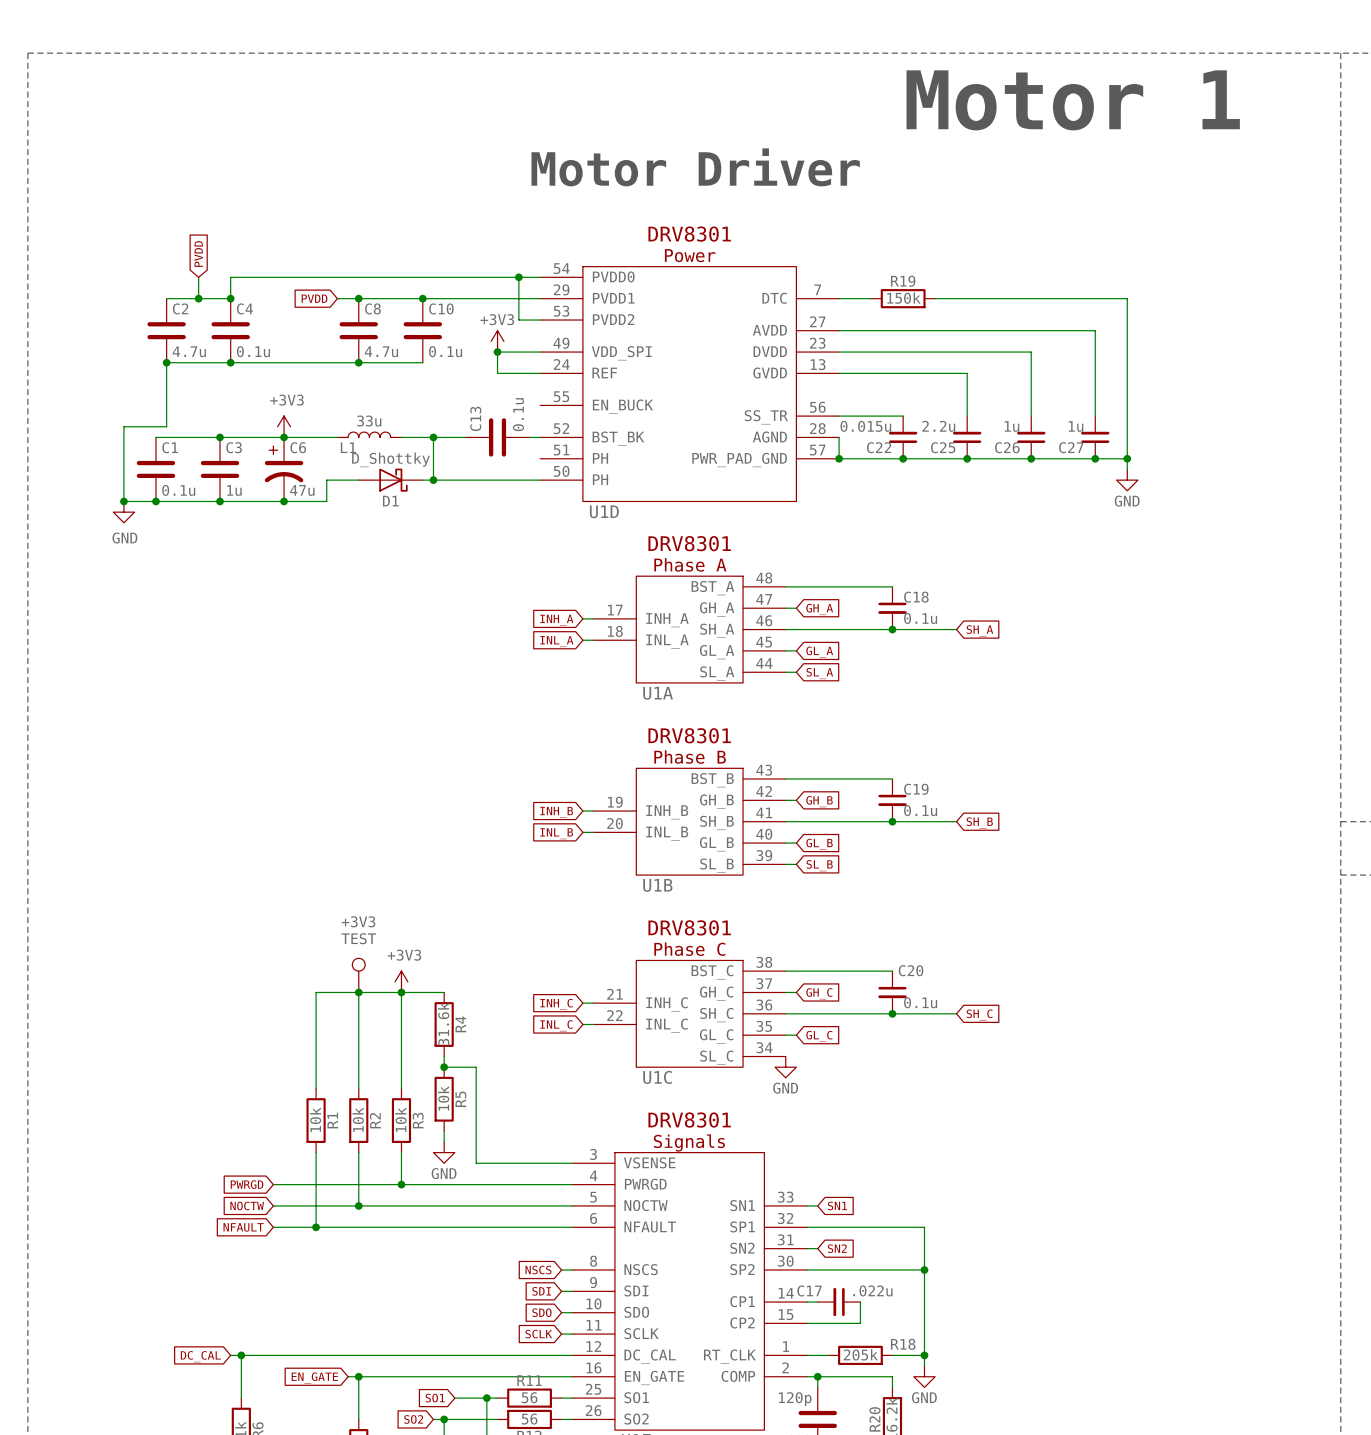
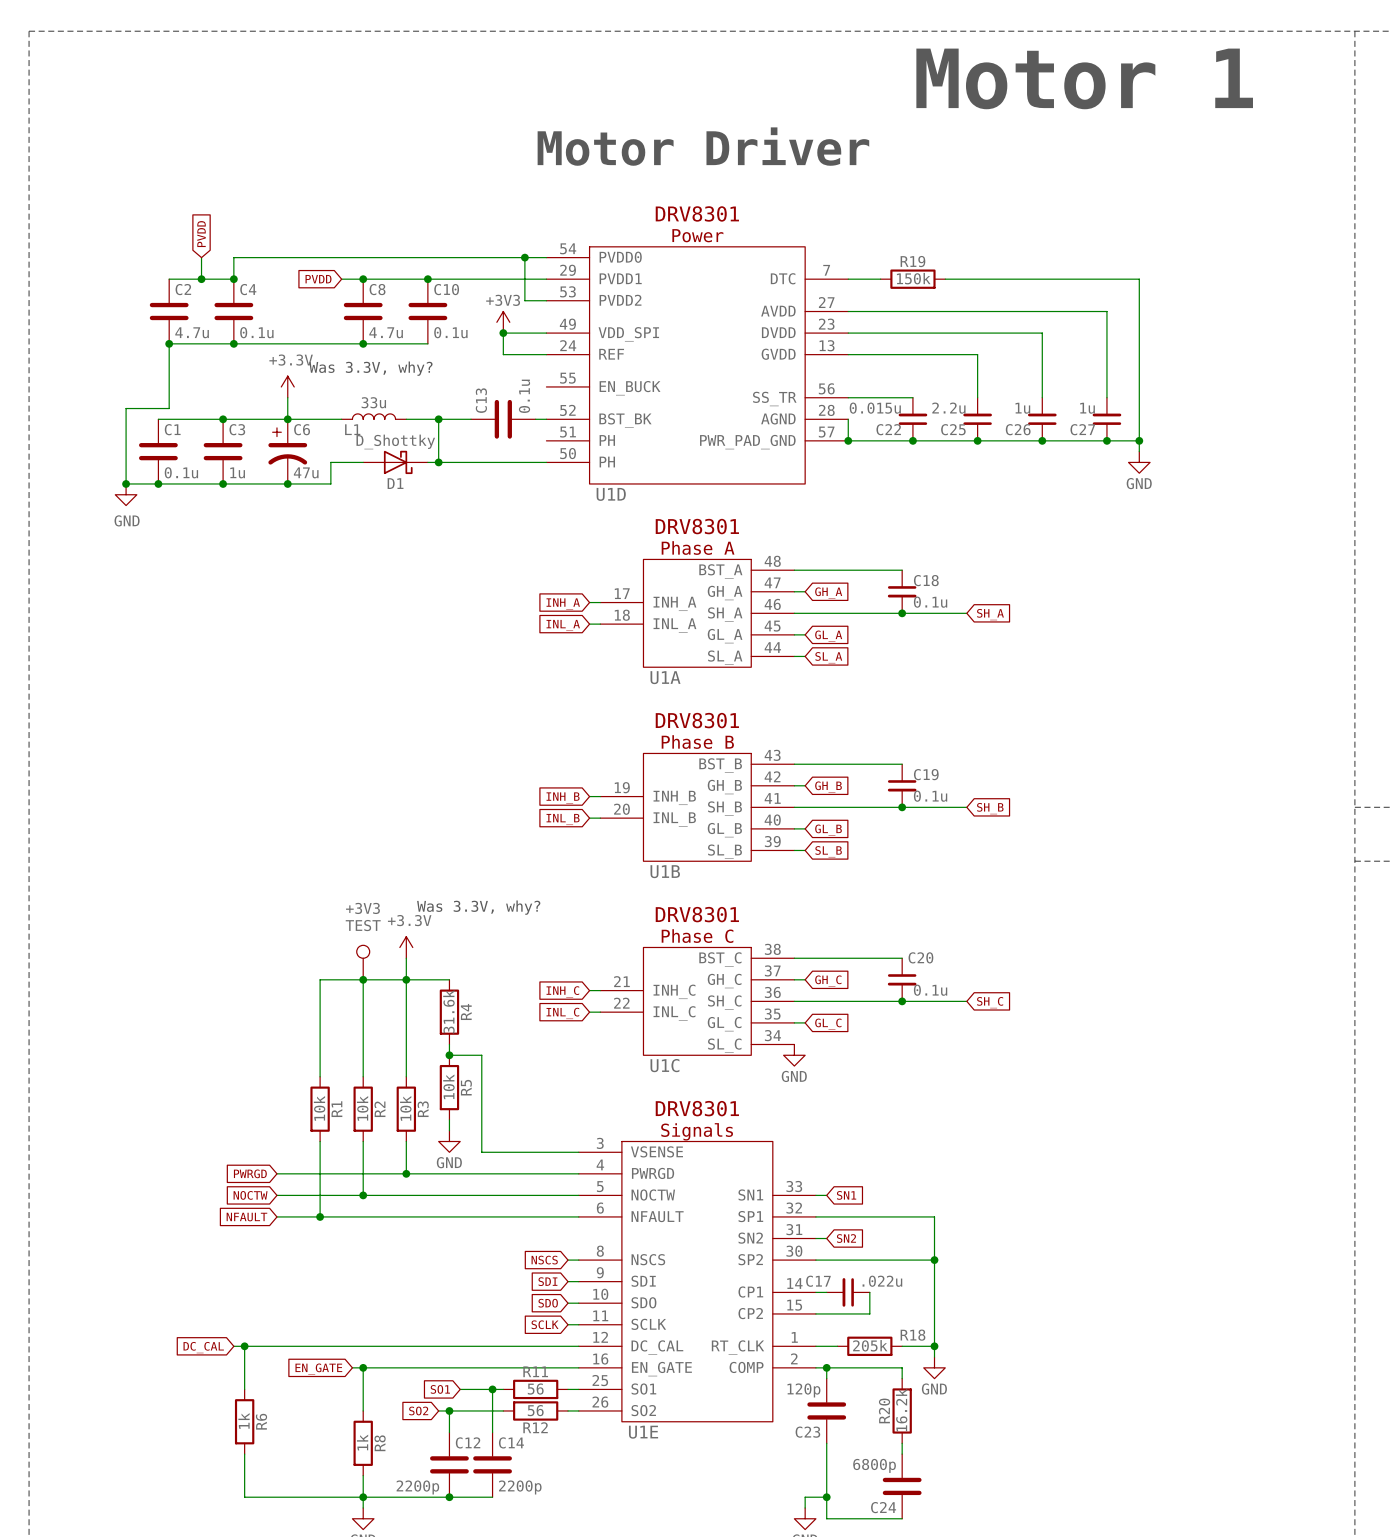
text: none -> Was 3.3V, why? (370, 368)
power symbol: none -> +3.3V (287, 386)
power symbol: +3V3 (284, 426) -> none
text: none -> Was 3.3V, why? (478, 907)
power symbol: none -> +3.3V (406, 947)
power symbol: +3V3 (401, 981) -> none

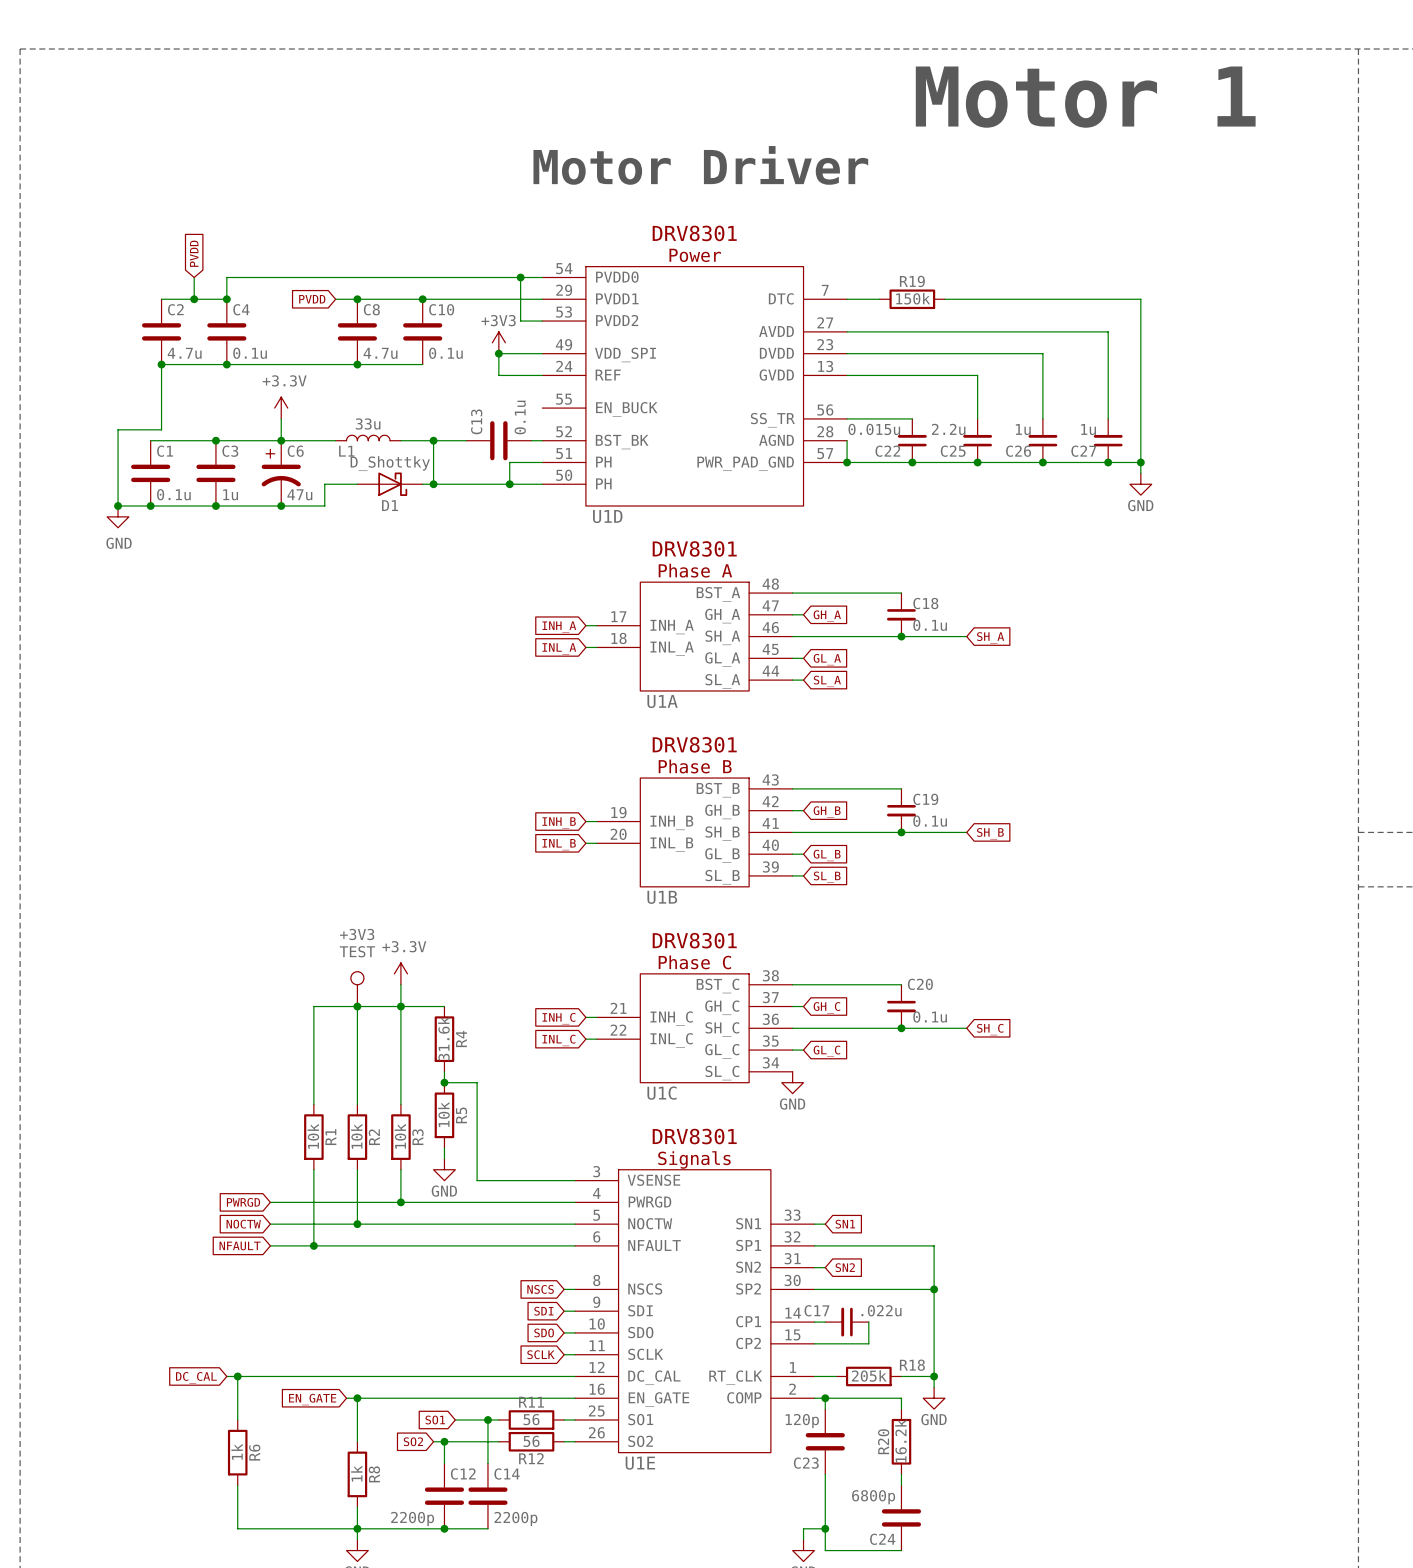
text: Was 3.3V, why? (370, 368) -> none
wire: none -> (542, 462) (509, 462) (509, 484)
junction: none -> (509, 484)
text: Was 3.3V, why? (478, 907) -> none

